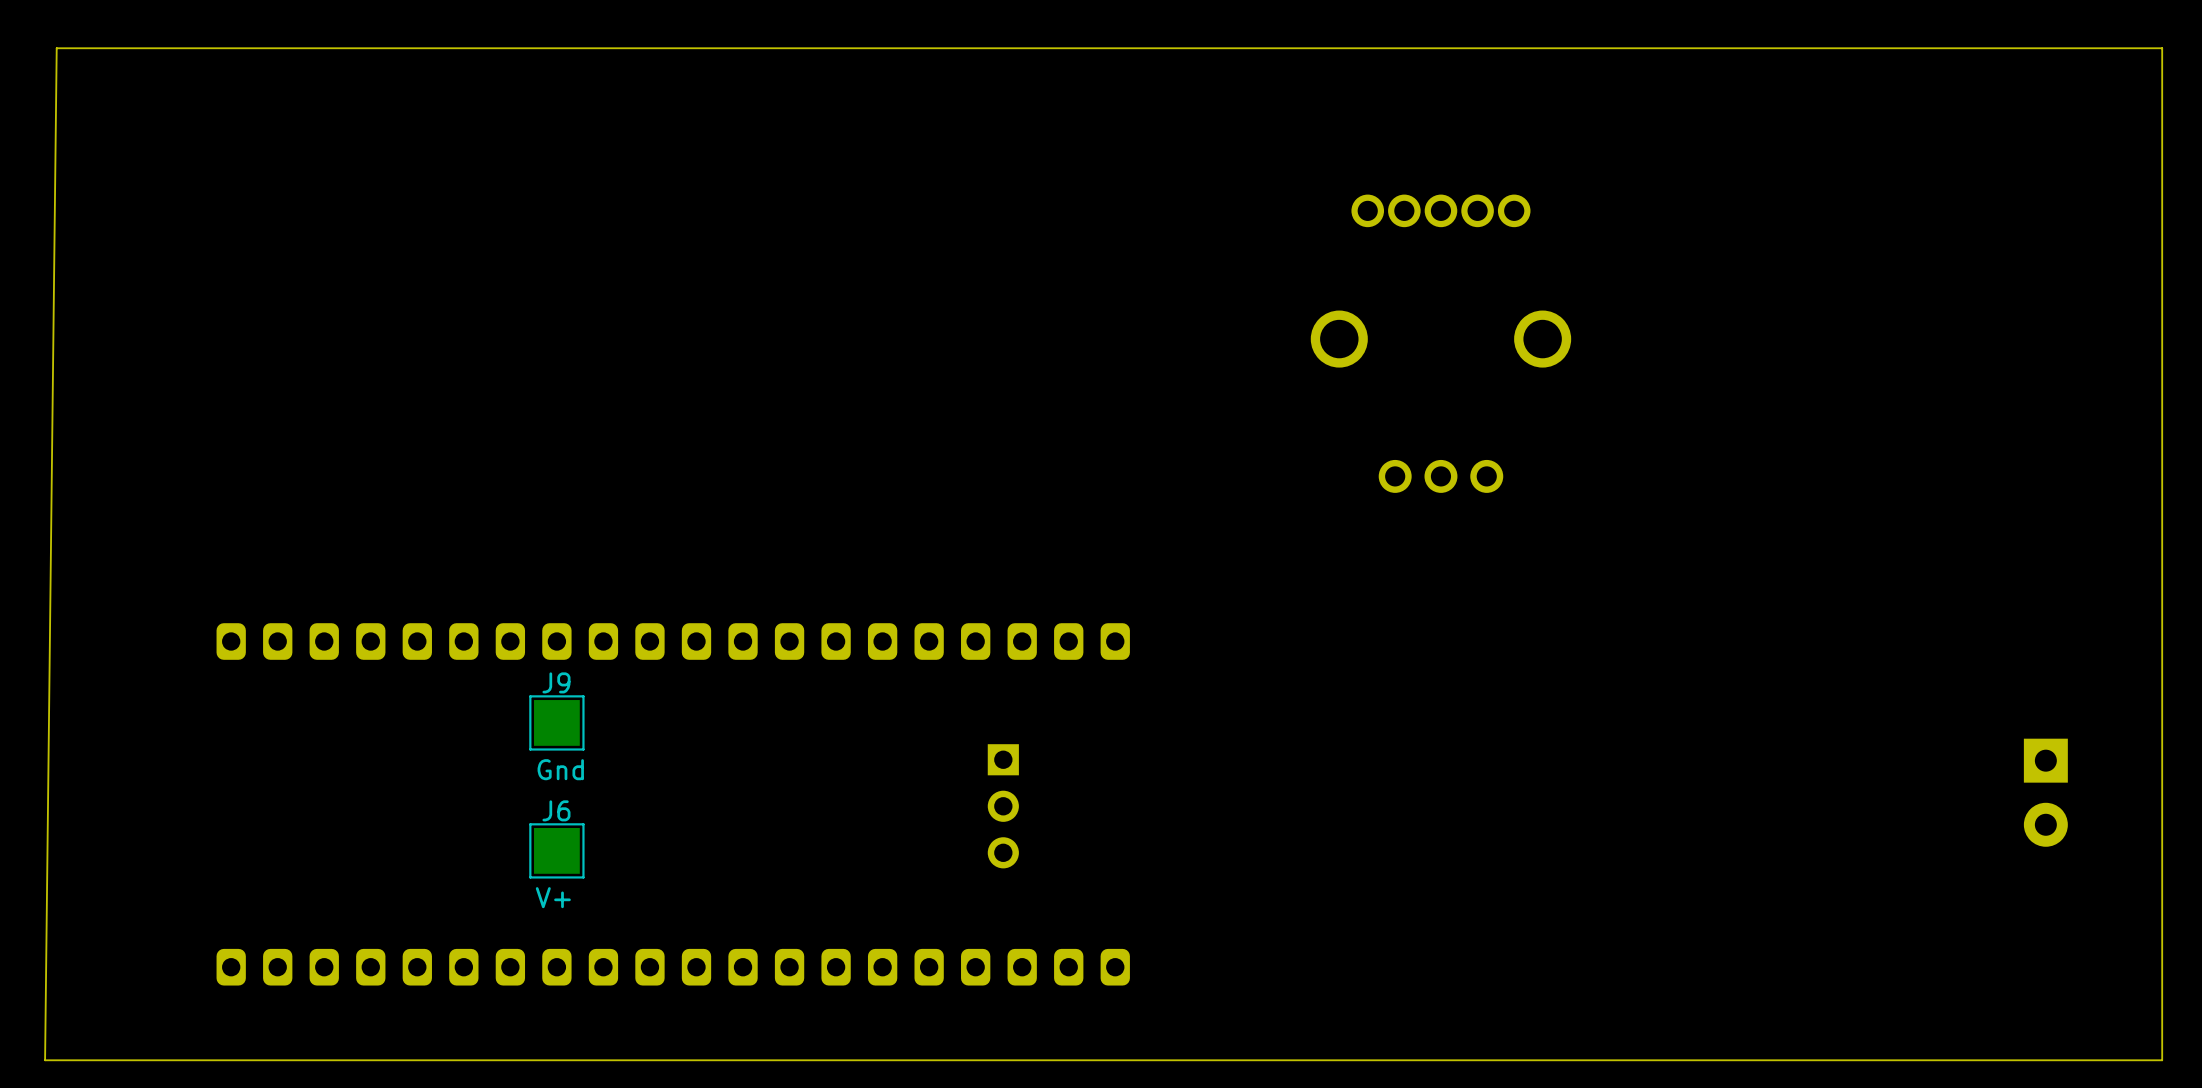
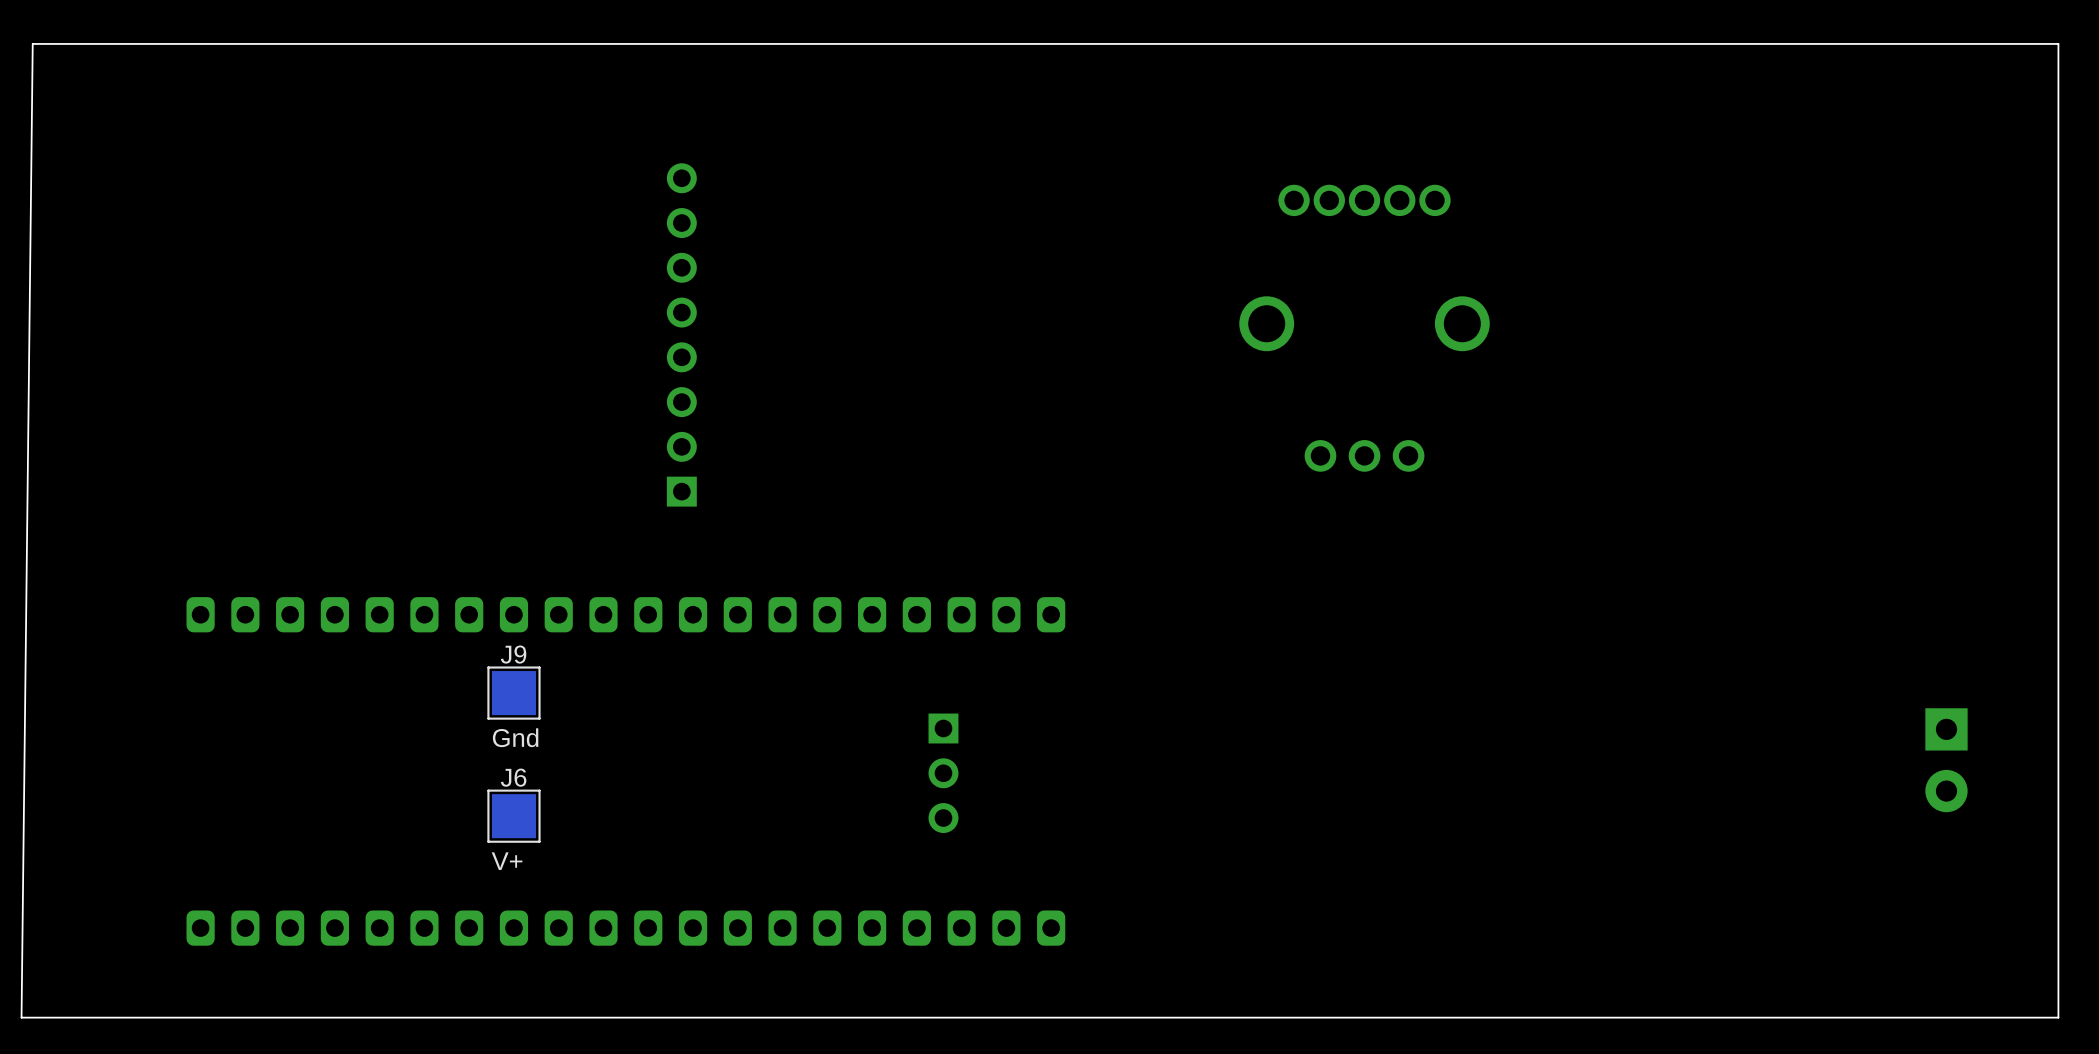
part: none -> (681, 334)

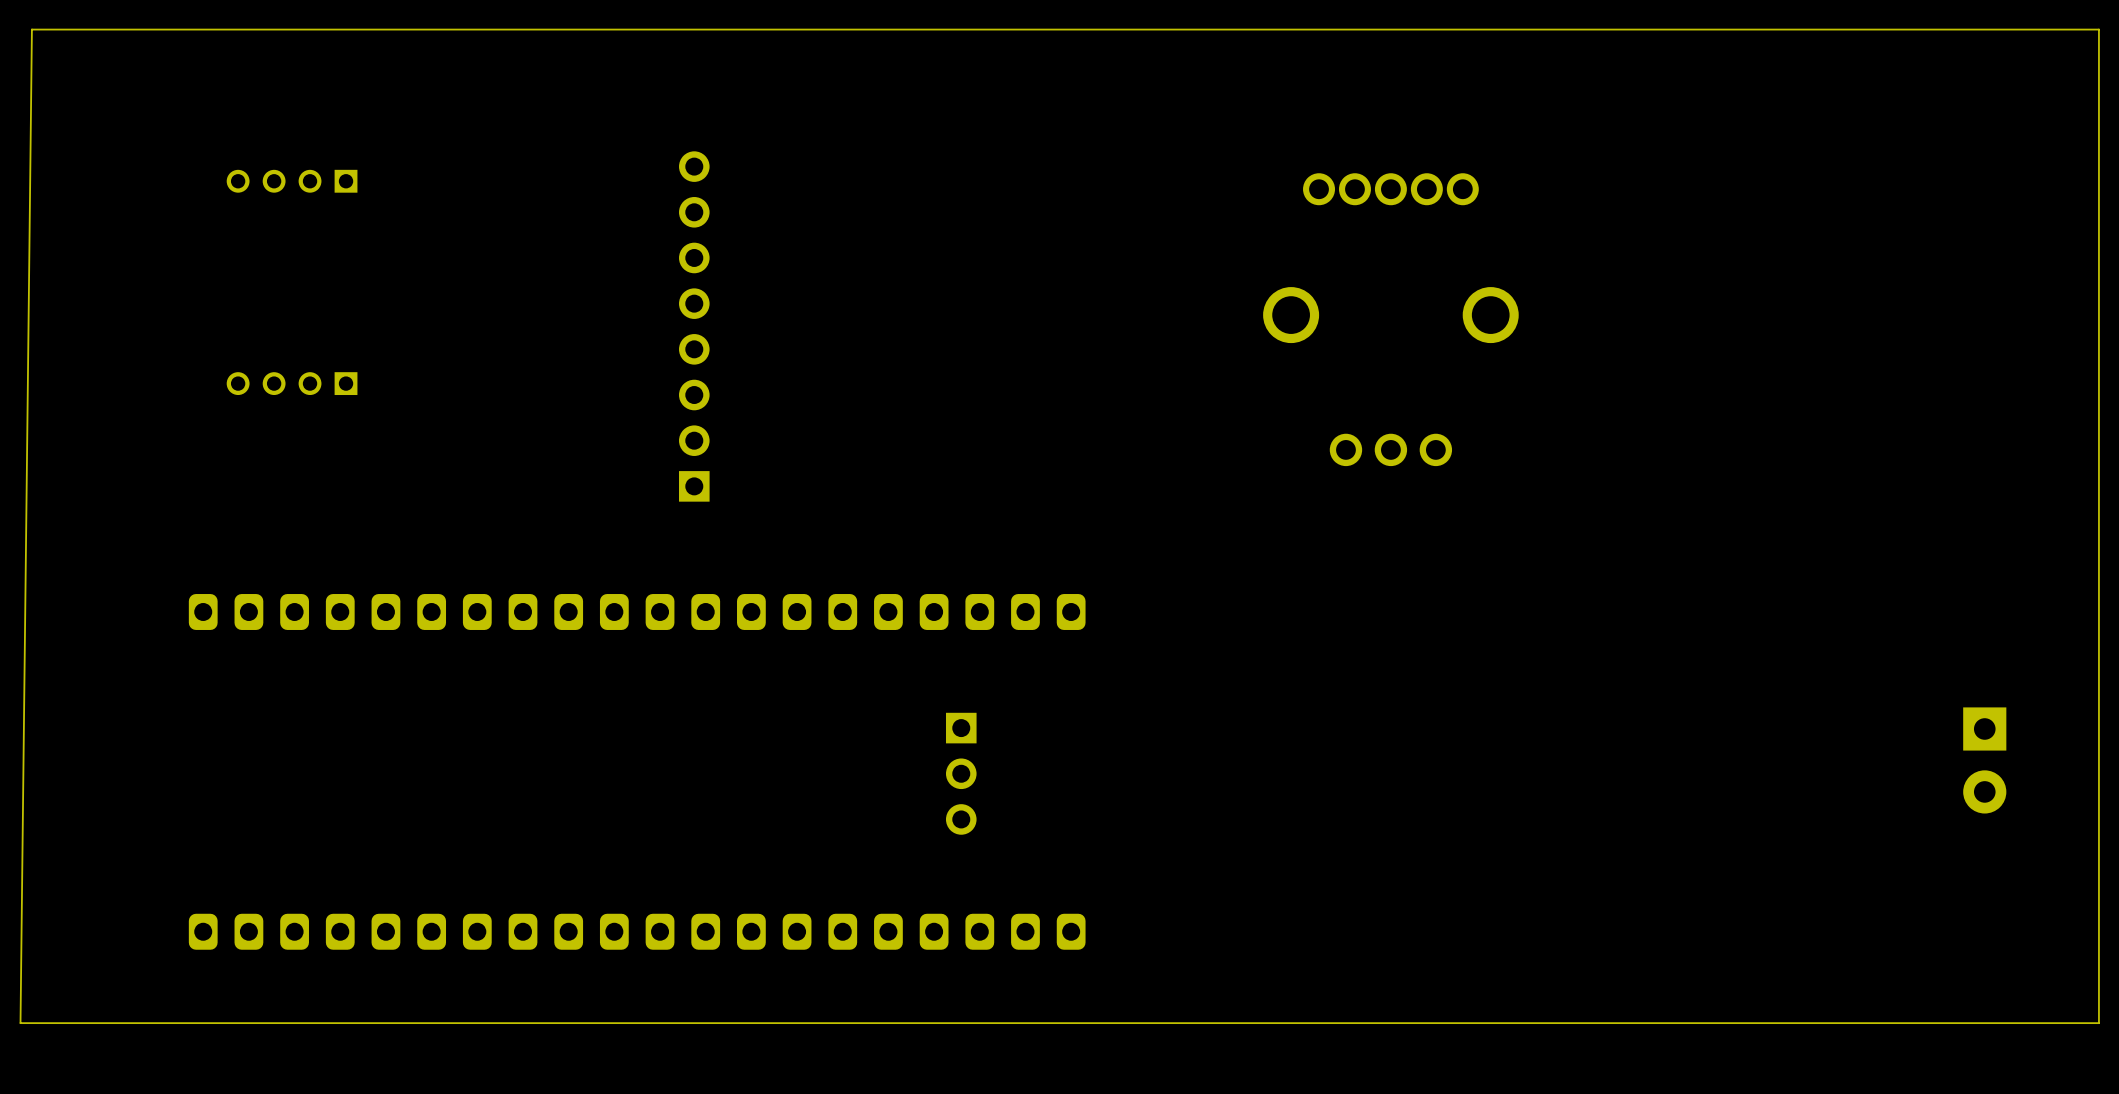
part: none -> (292, 181)
part: none -> (292, 383)
J9: (513, 693) -> none
text: Gnd (515, 737) -> none
J6: (513, 816) -> none
text: V+ (507, 861) -> none

